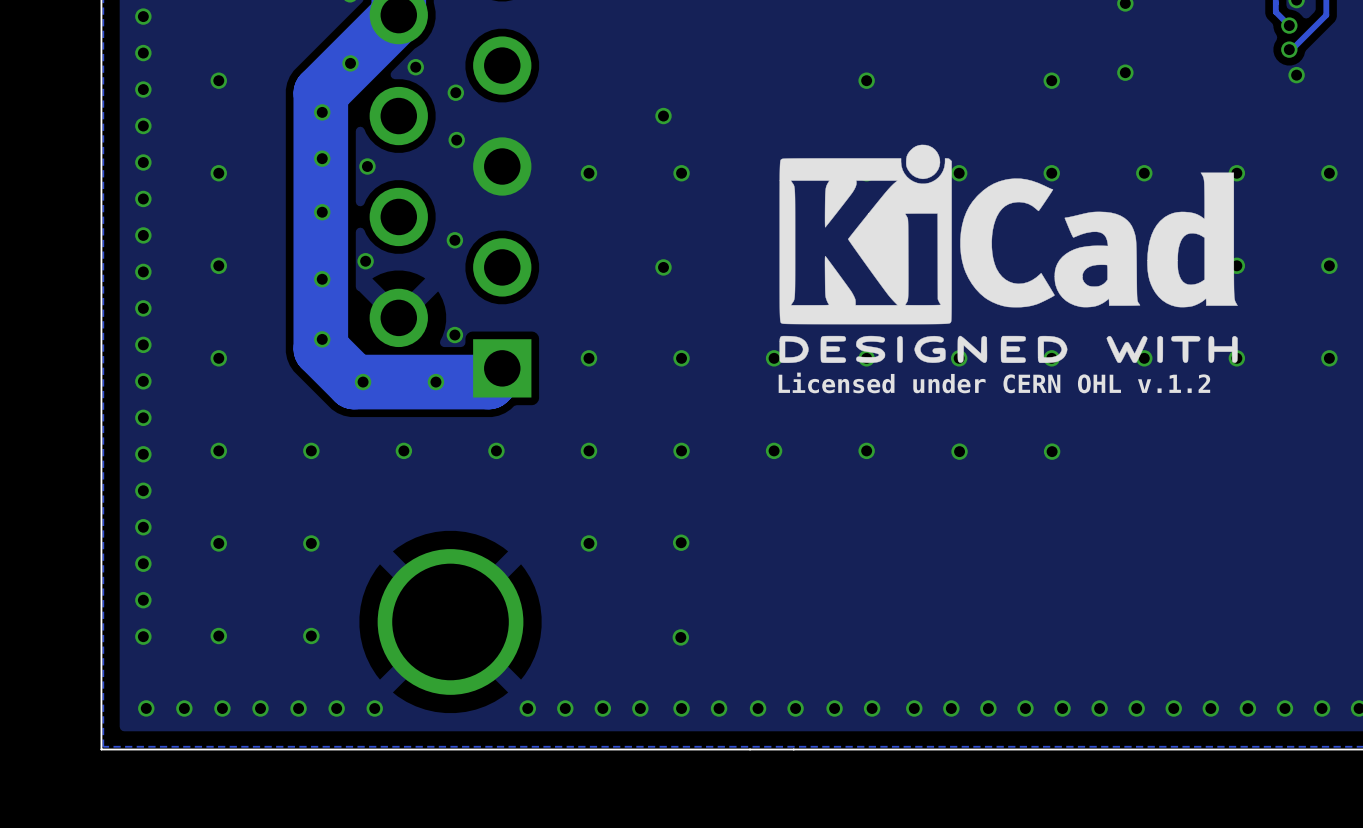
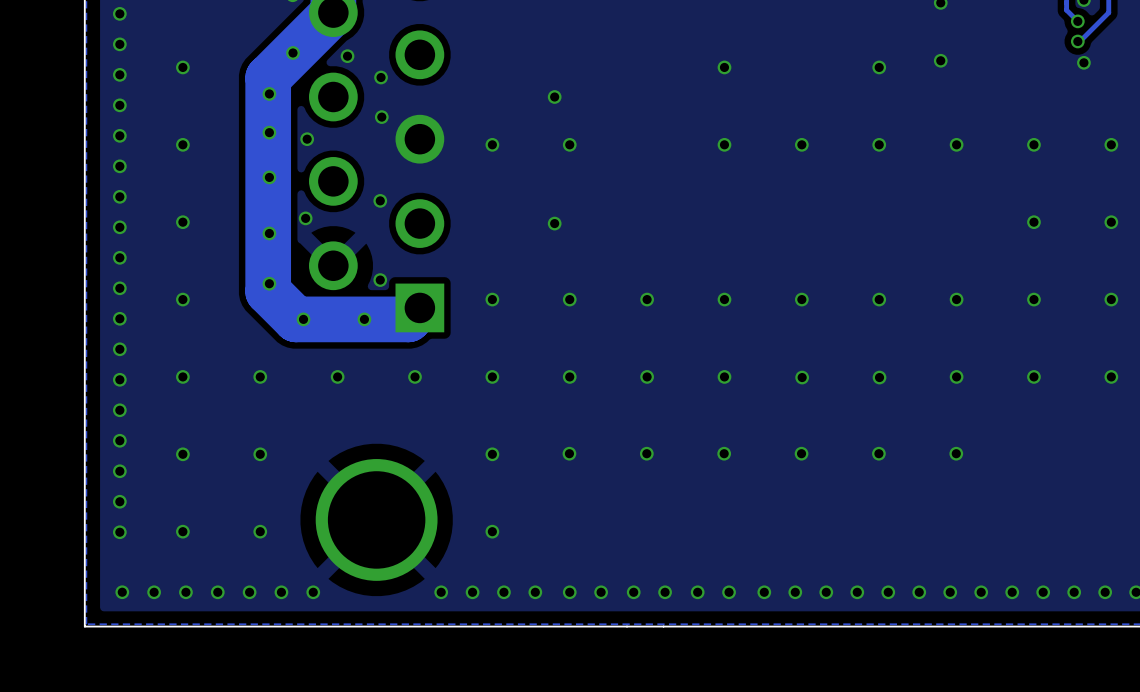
drawing: [779, 144, 1238, 364] -> none
text: Licensed under CERN OHL v.1.2 (994, 382) -> none
via: none -> (956, 376)
via: none -> (1033, 376)
via: none -> (1111, 376)
via: none -> (646, 453)
via: none -> (724, 453)
via: none -> (801, 453)
via: none -> (878, 453)
via: none -> (956, 453)
via: none -> (492, 531)
via: (680, 637) -> none

